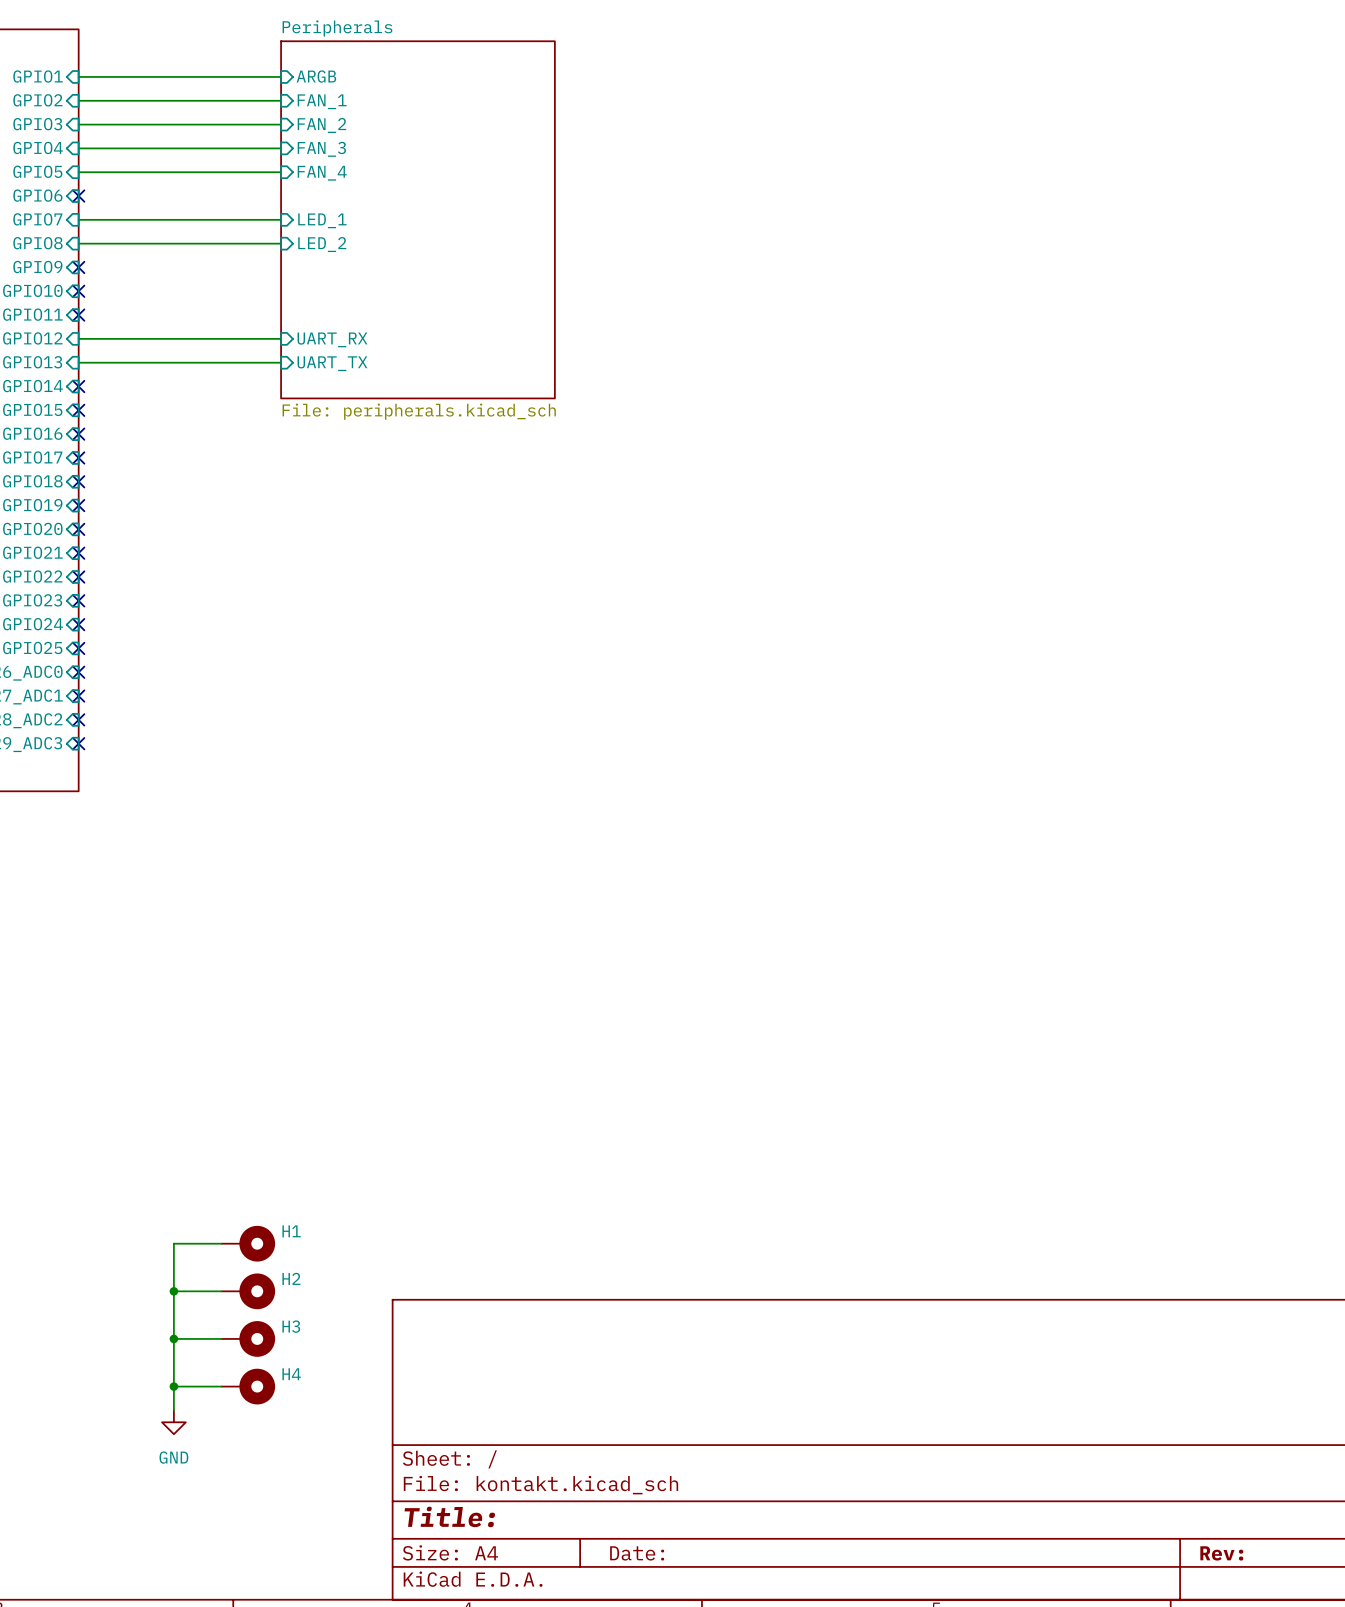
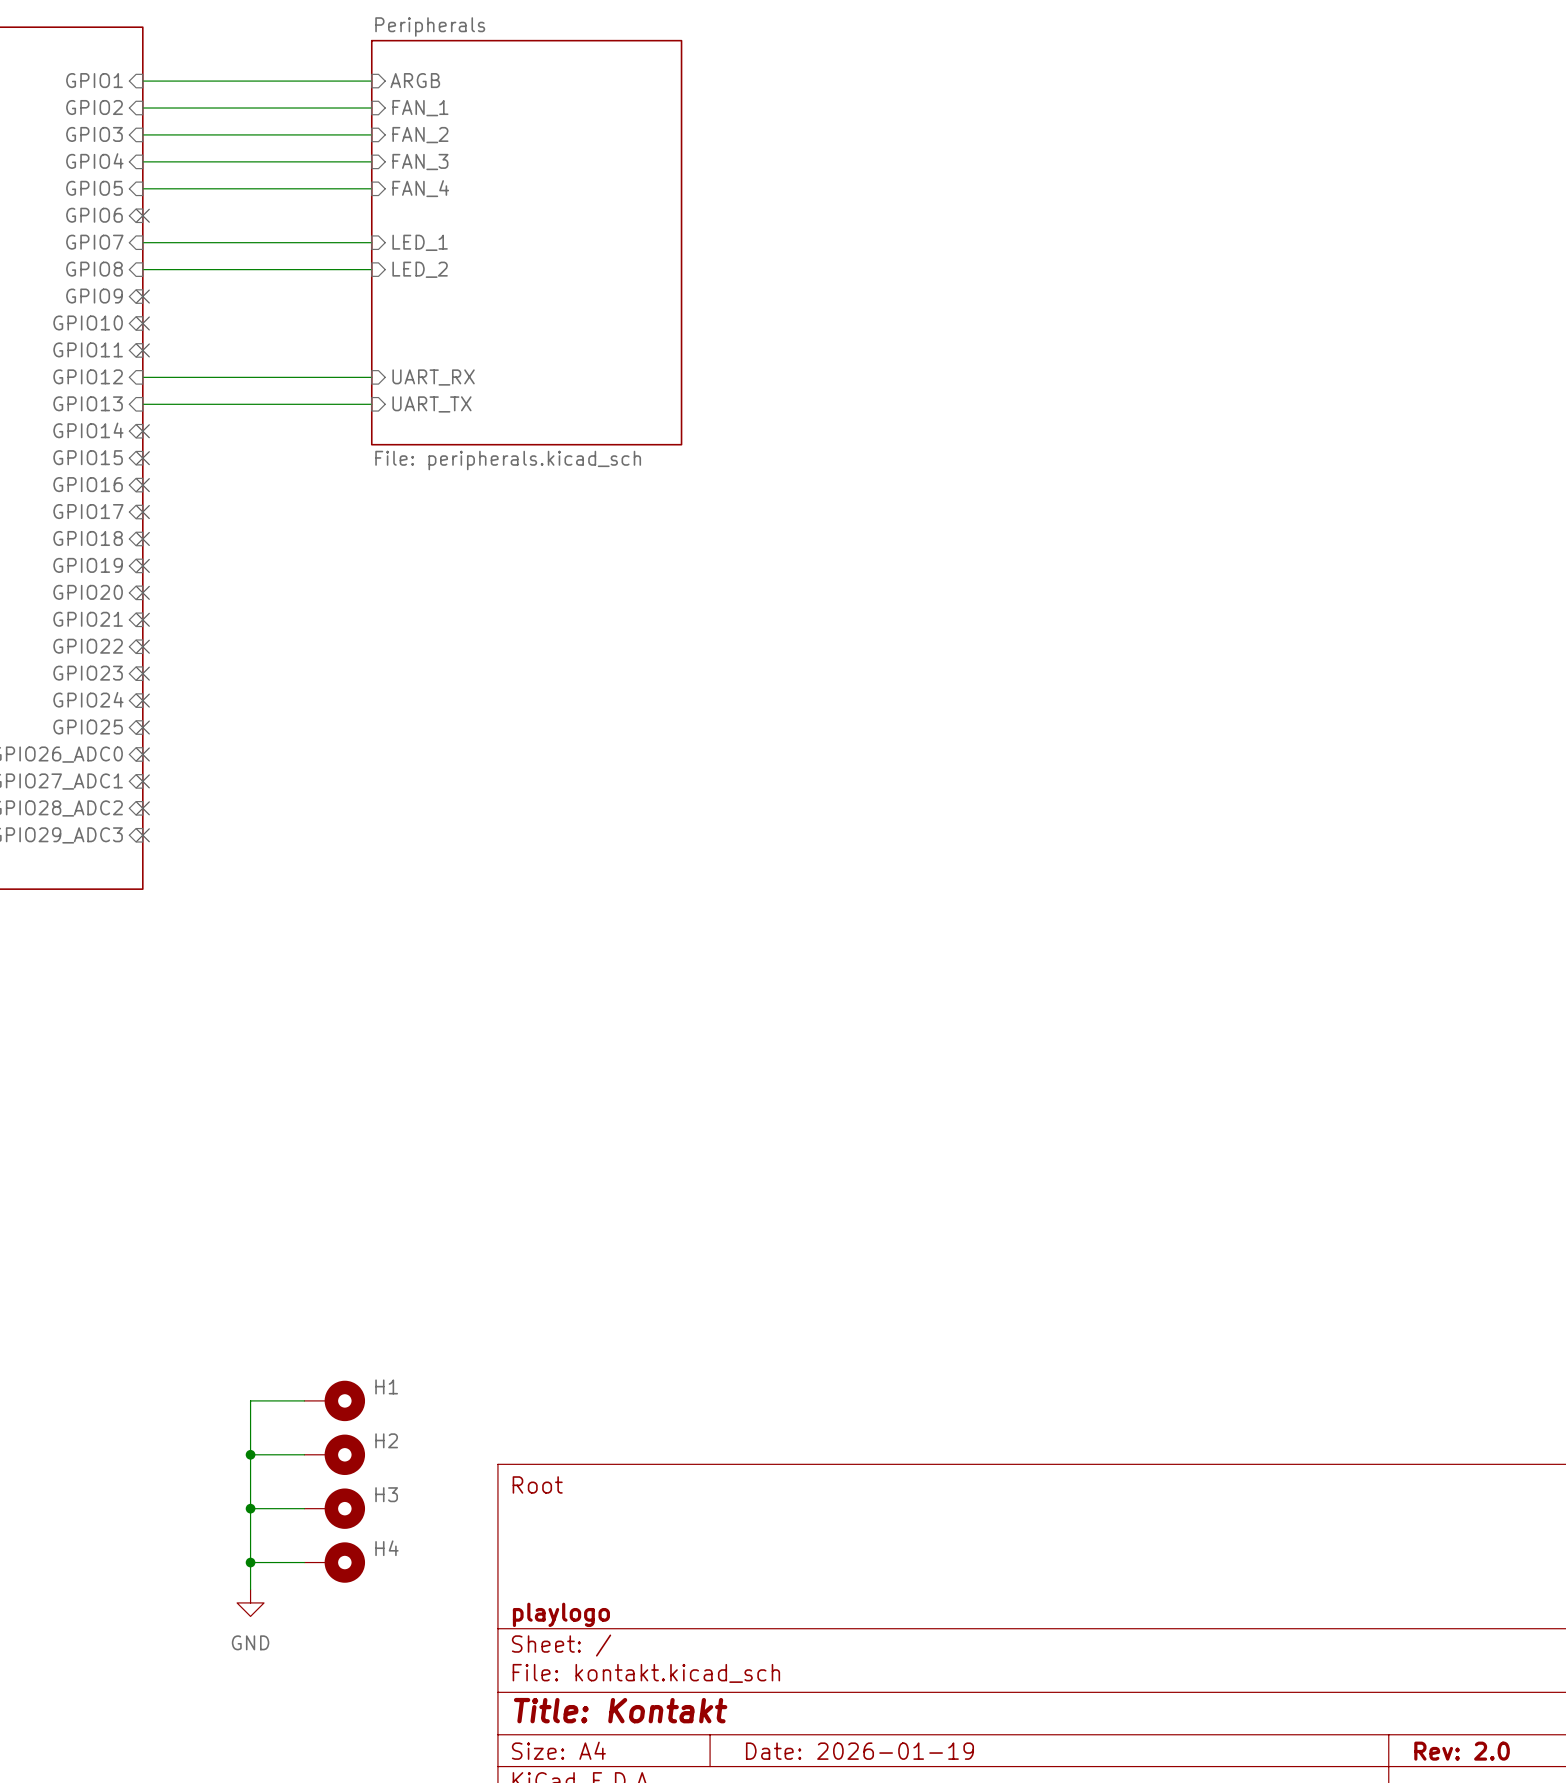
title block: none -> Root (537, 1484)
title block: none -> playlogo (561, 1614)
title block: Title: (449, 1516) -> Title: Kontakt (620, 1710)
title block: Date: (637, 1553) -> Date: 2026-01-19 (859, 1751)
title block: Rev: (1221, 1553) -> Rev: 2.0 (1462, 1751)

